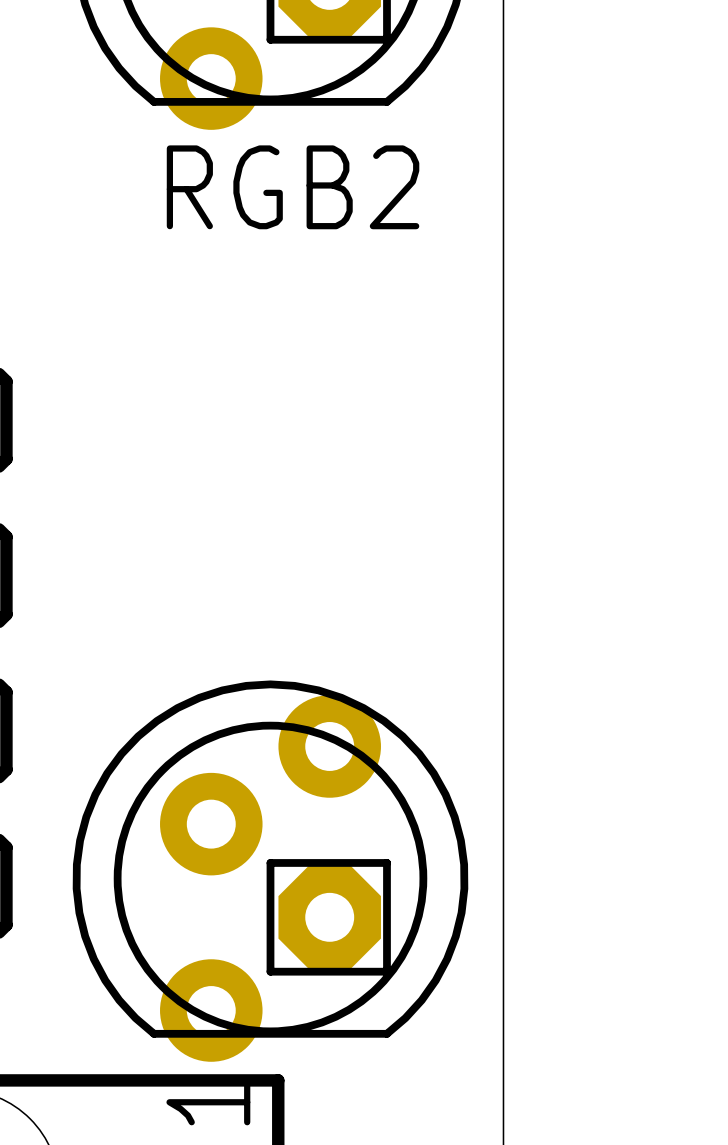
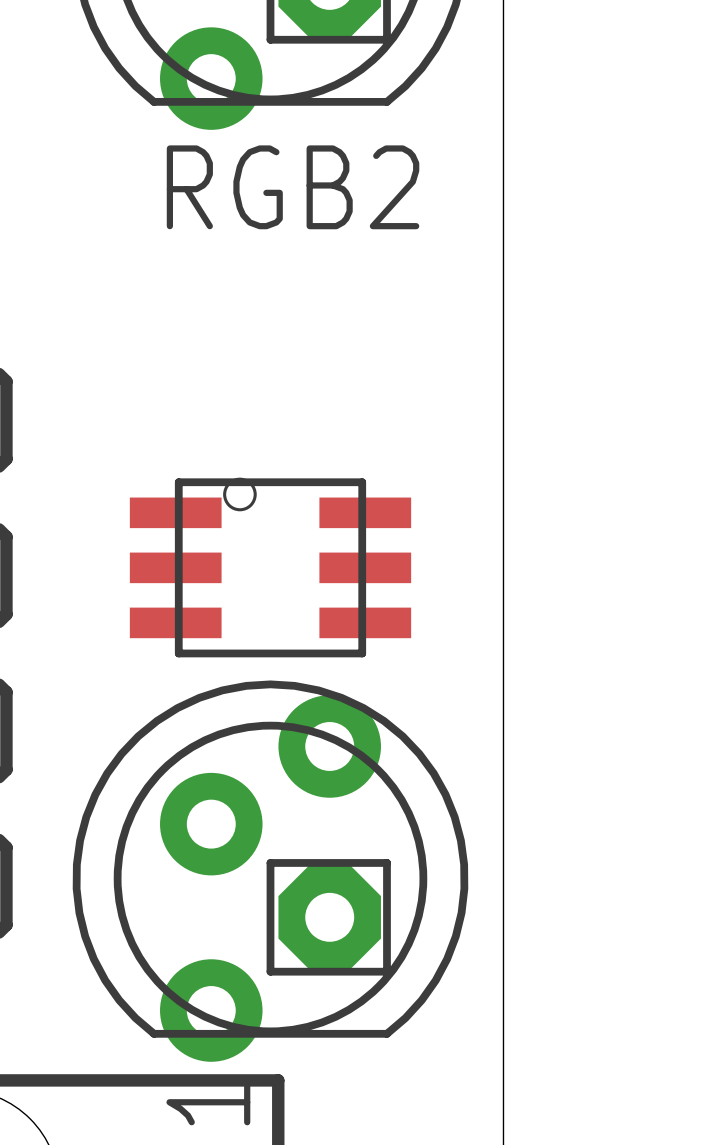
part: none -> (270, 567)

